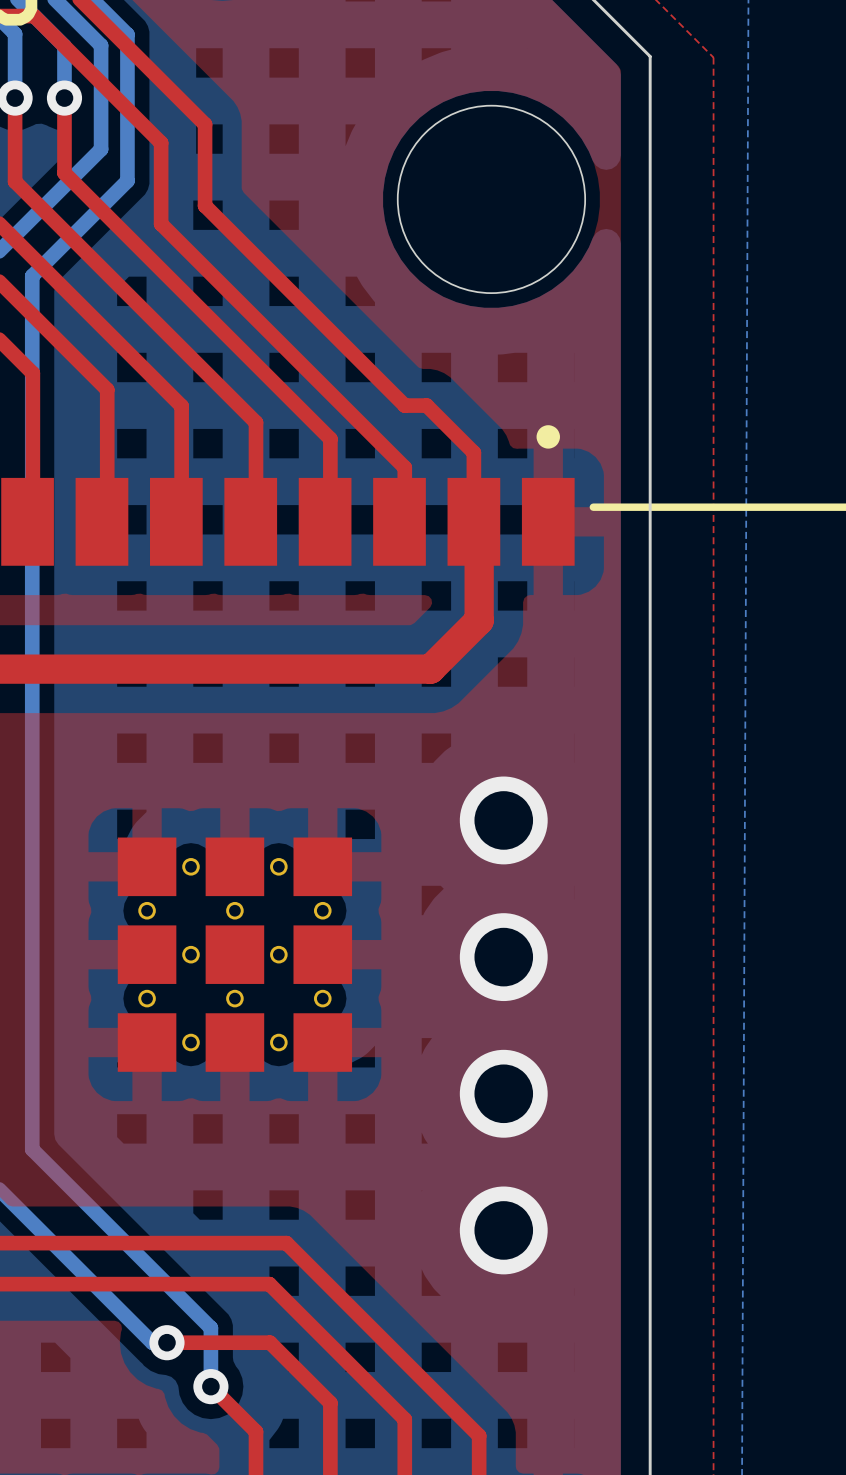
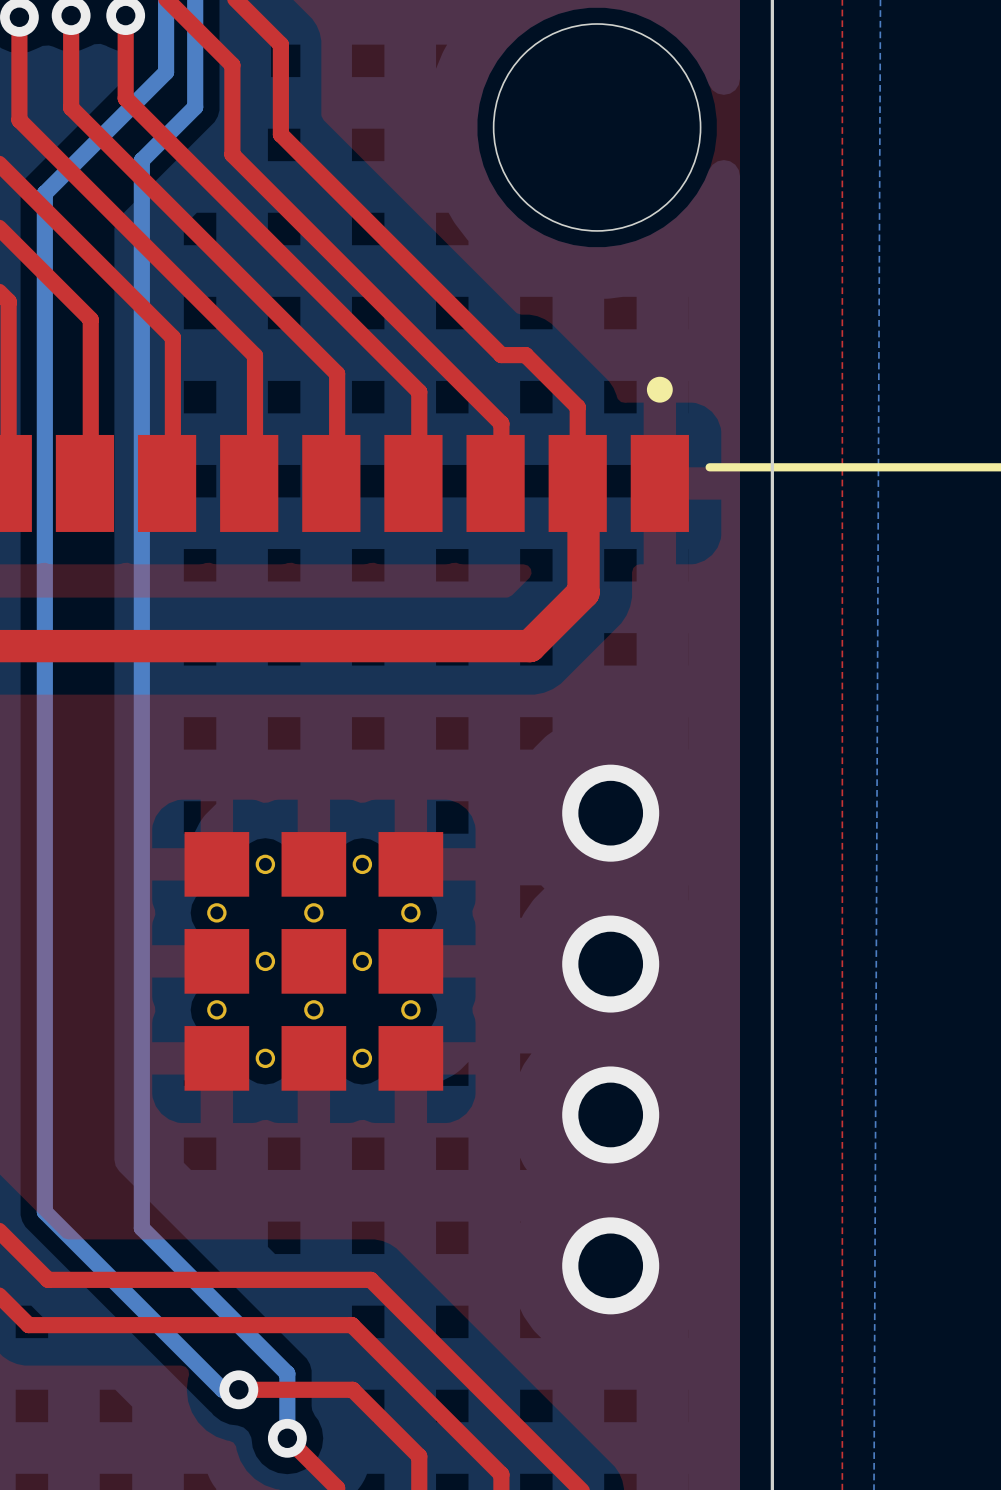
bottom track: (79, 229) (32, 276) (32, 1149) (79, 1196) -> (141, 160) (141, 1228)

